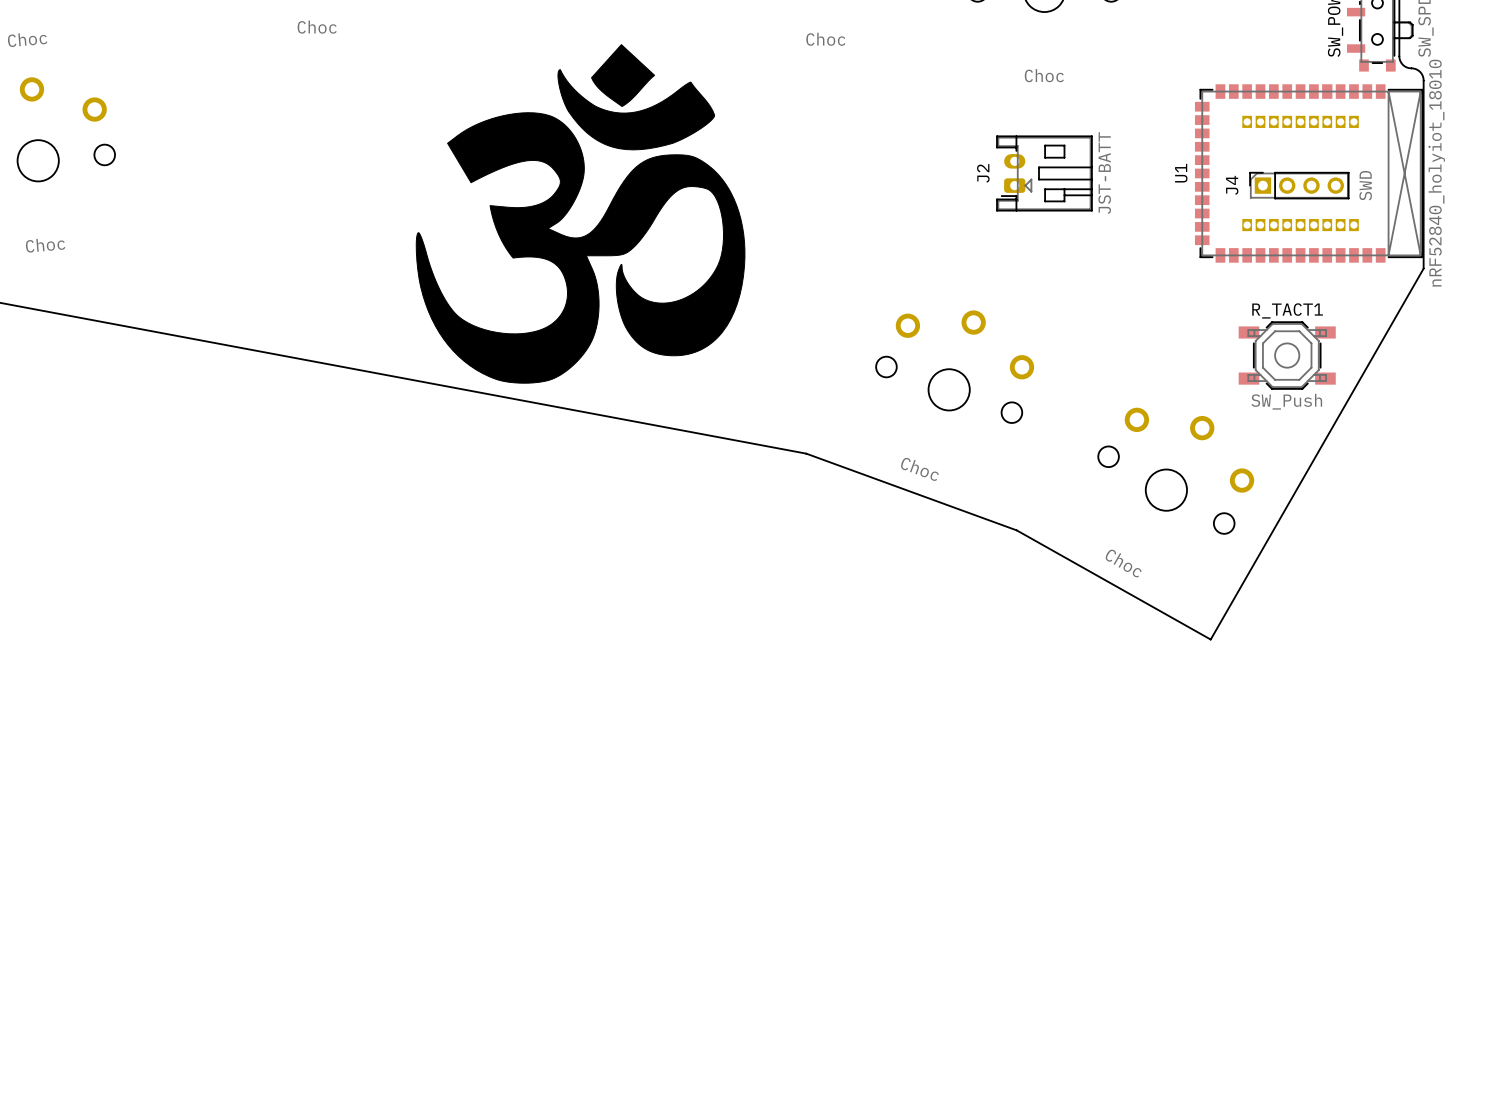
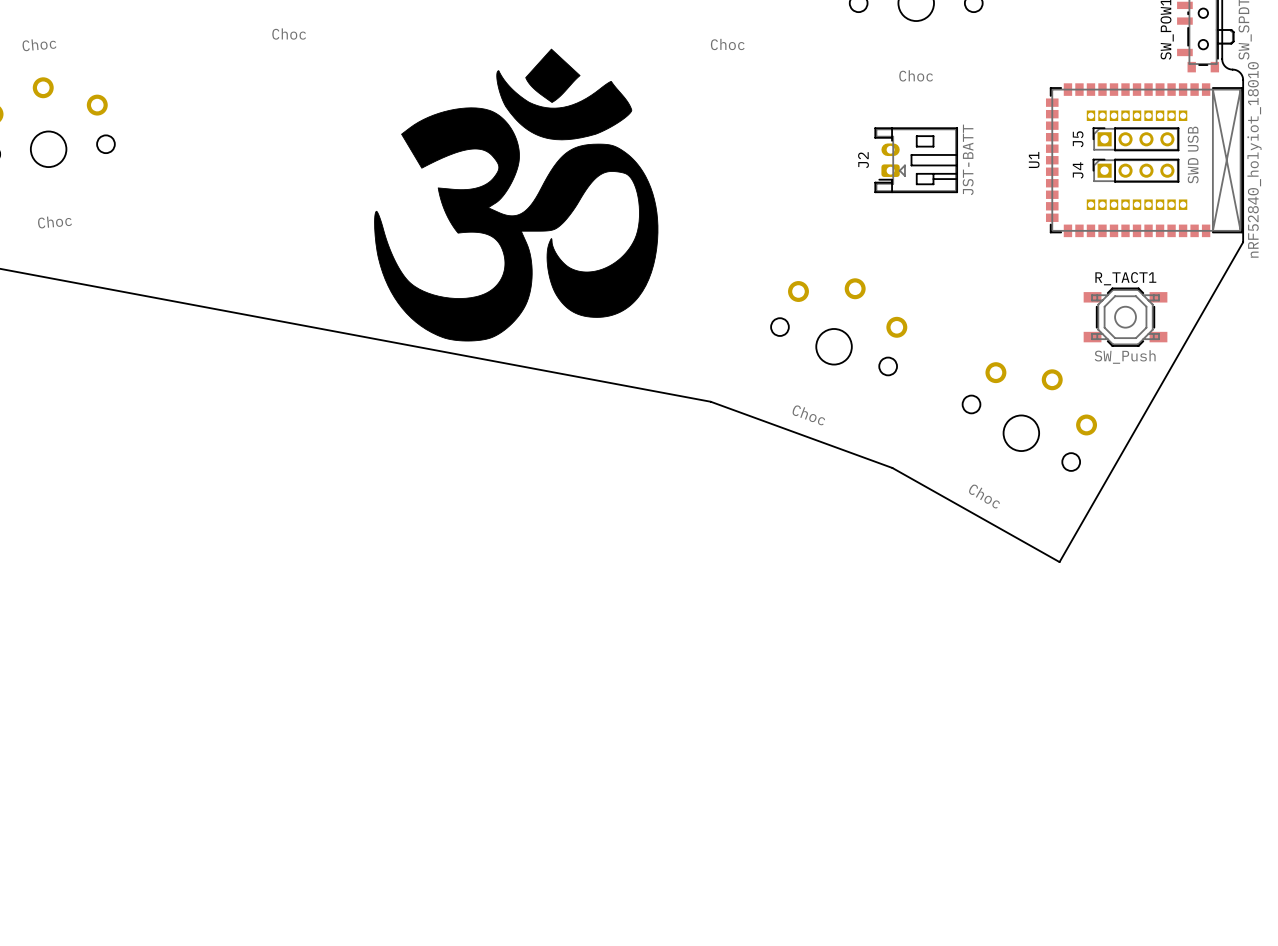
J5: none -> USB (1135, 139)

